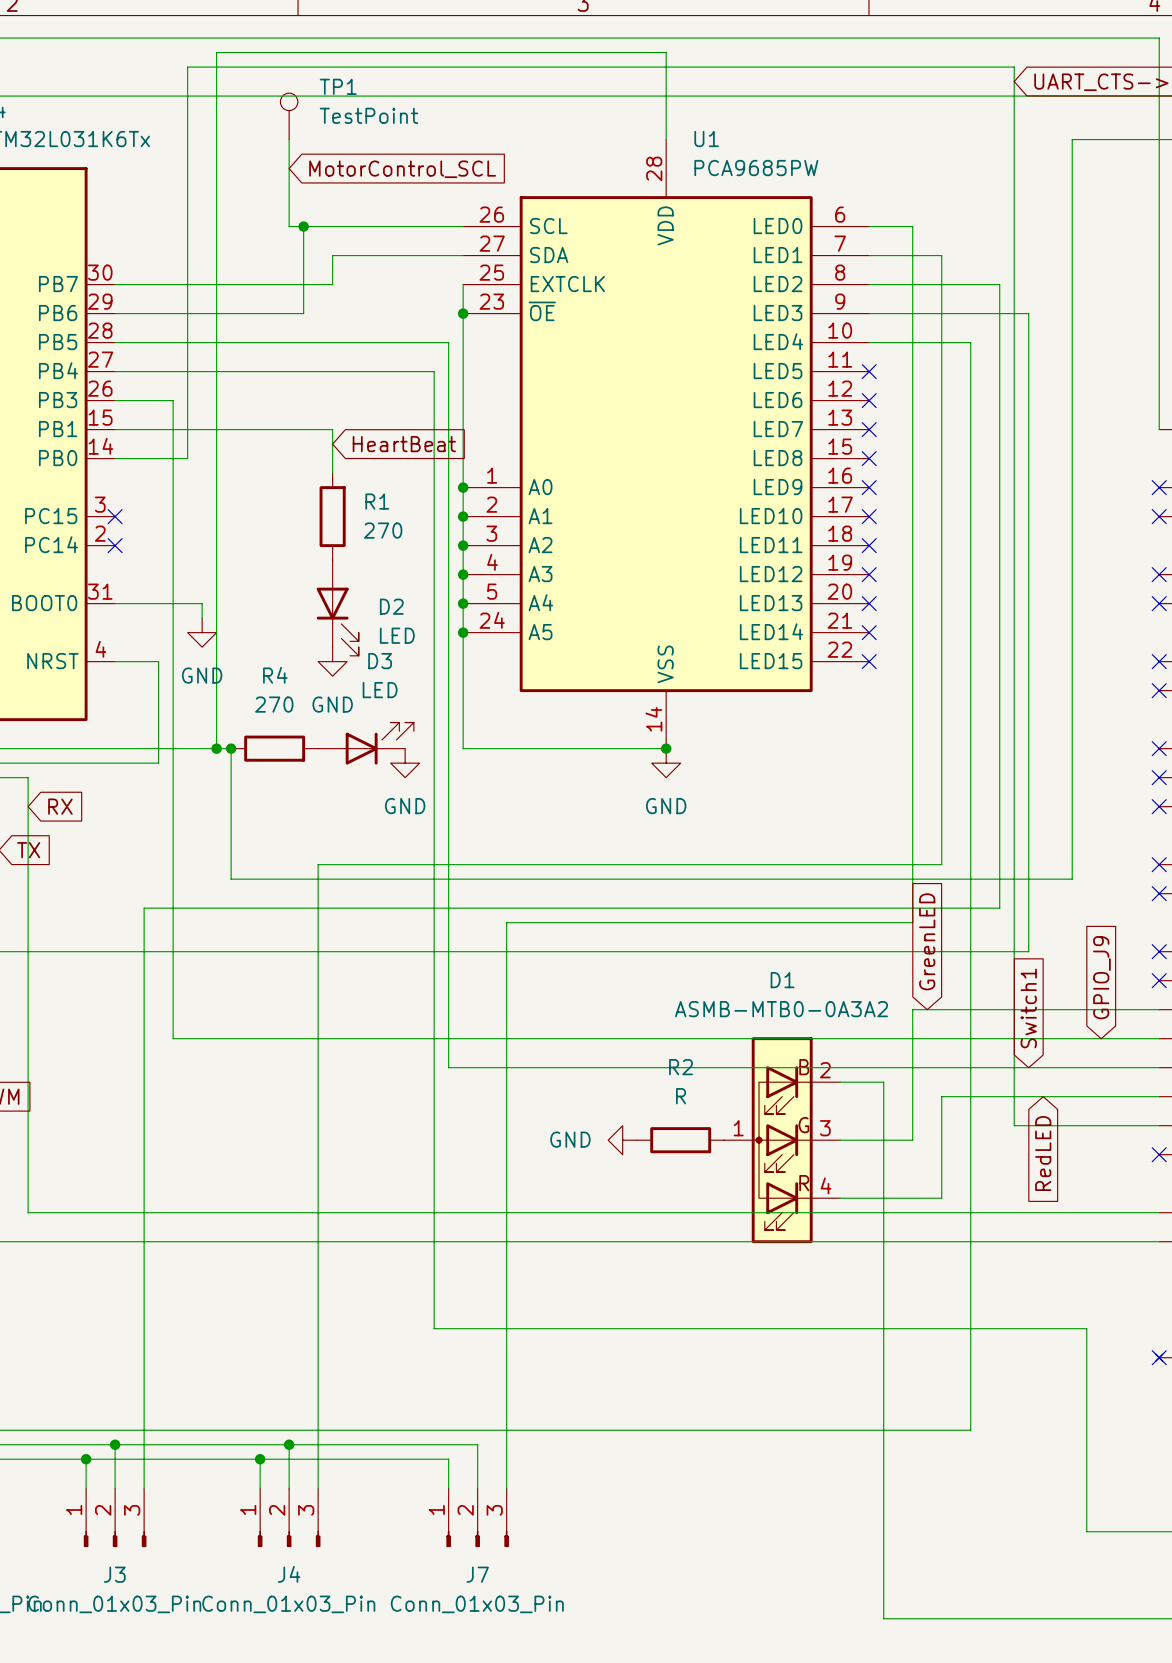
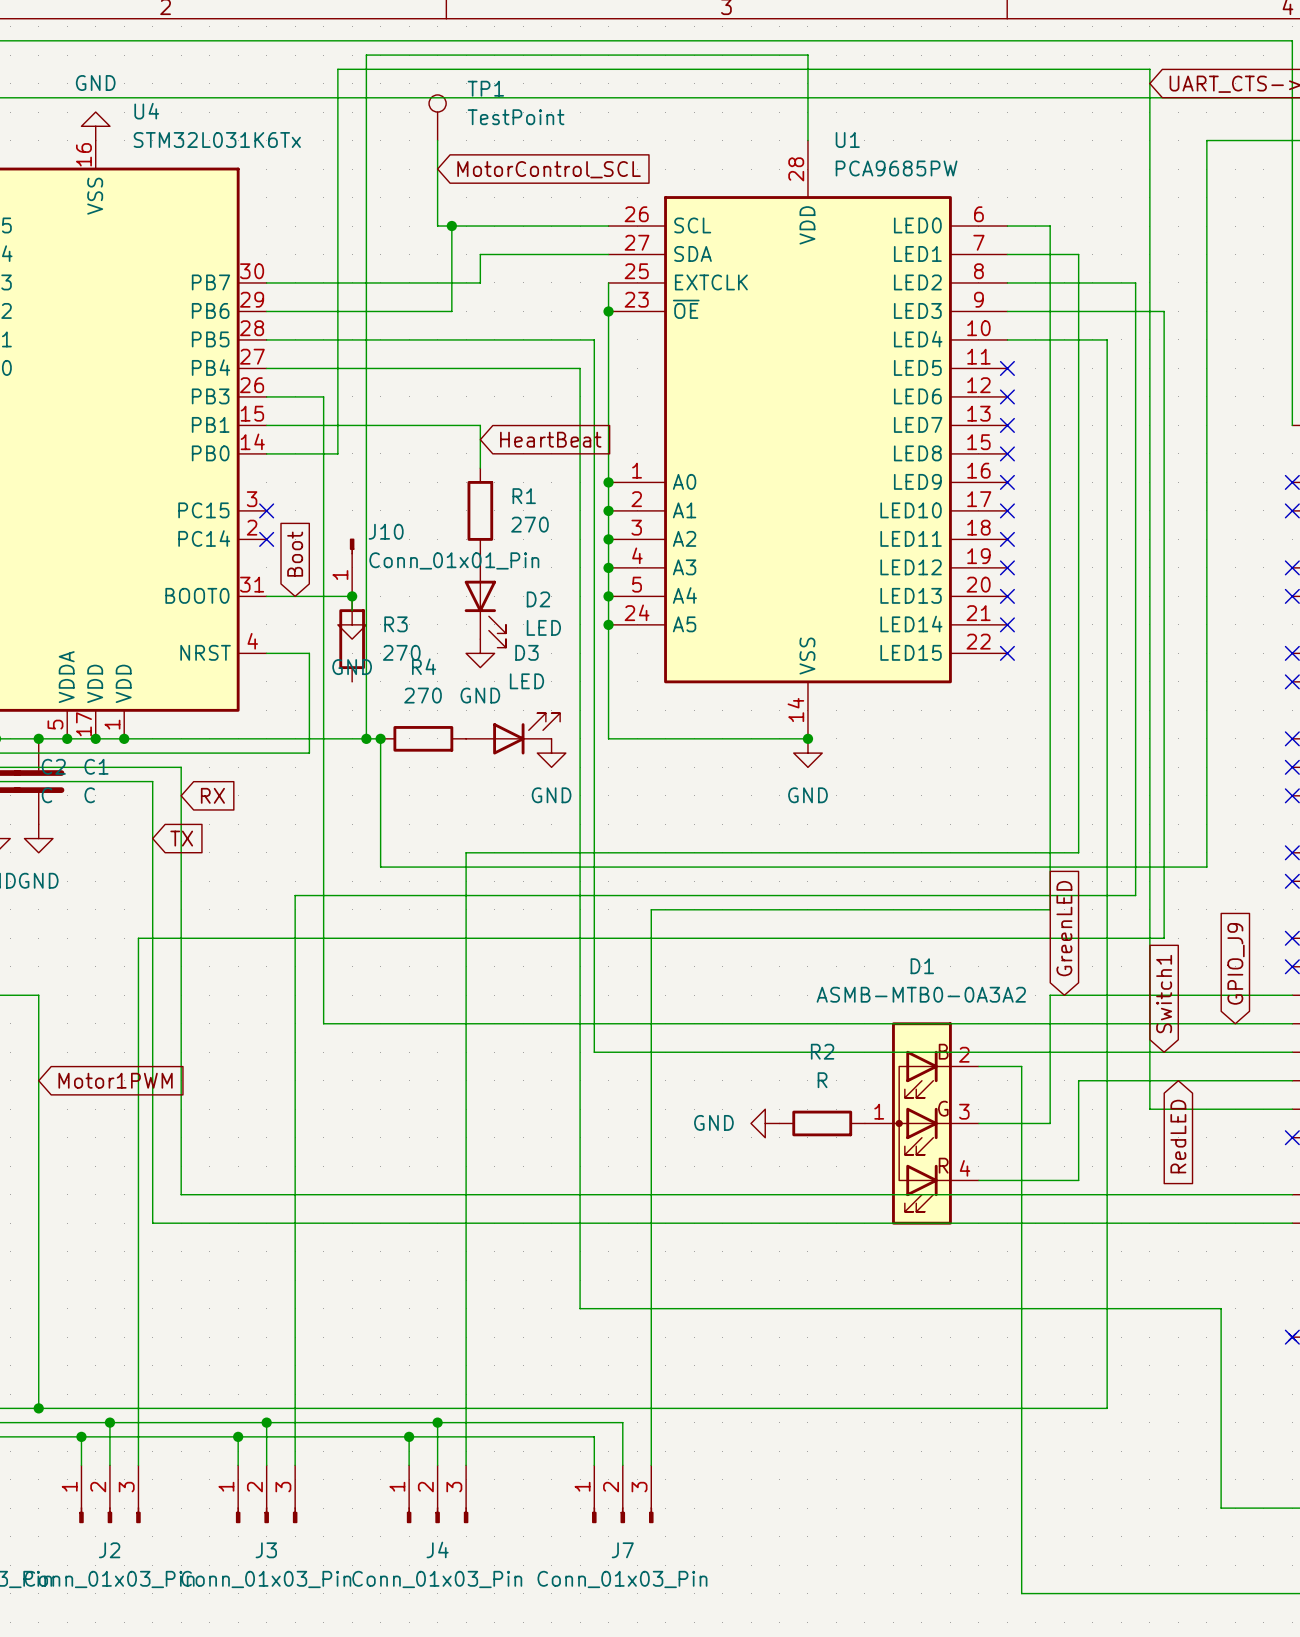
global label: none -> Boot (295, 554)
J10: none -> Conn_01x01_Pin (352, 567)
junction: none -> (352, 596)
R3: none -> 270 (352, 639)

